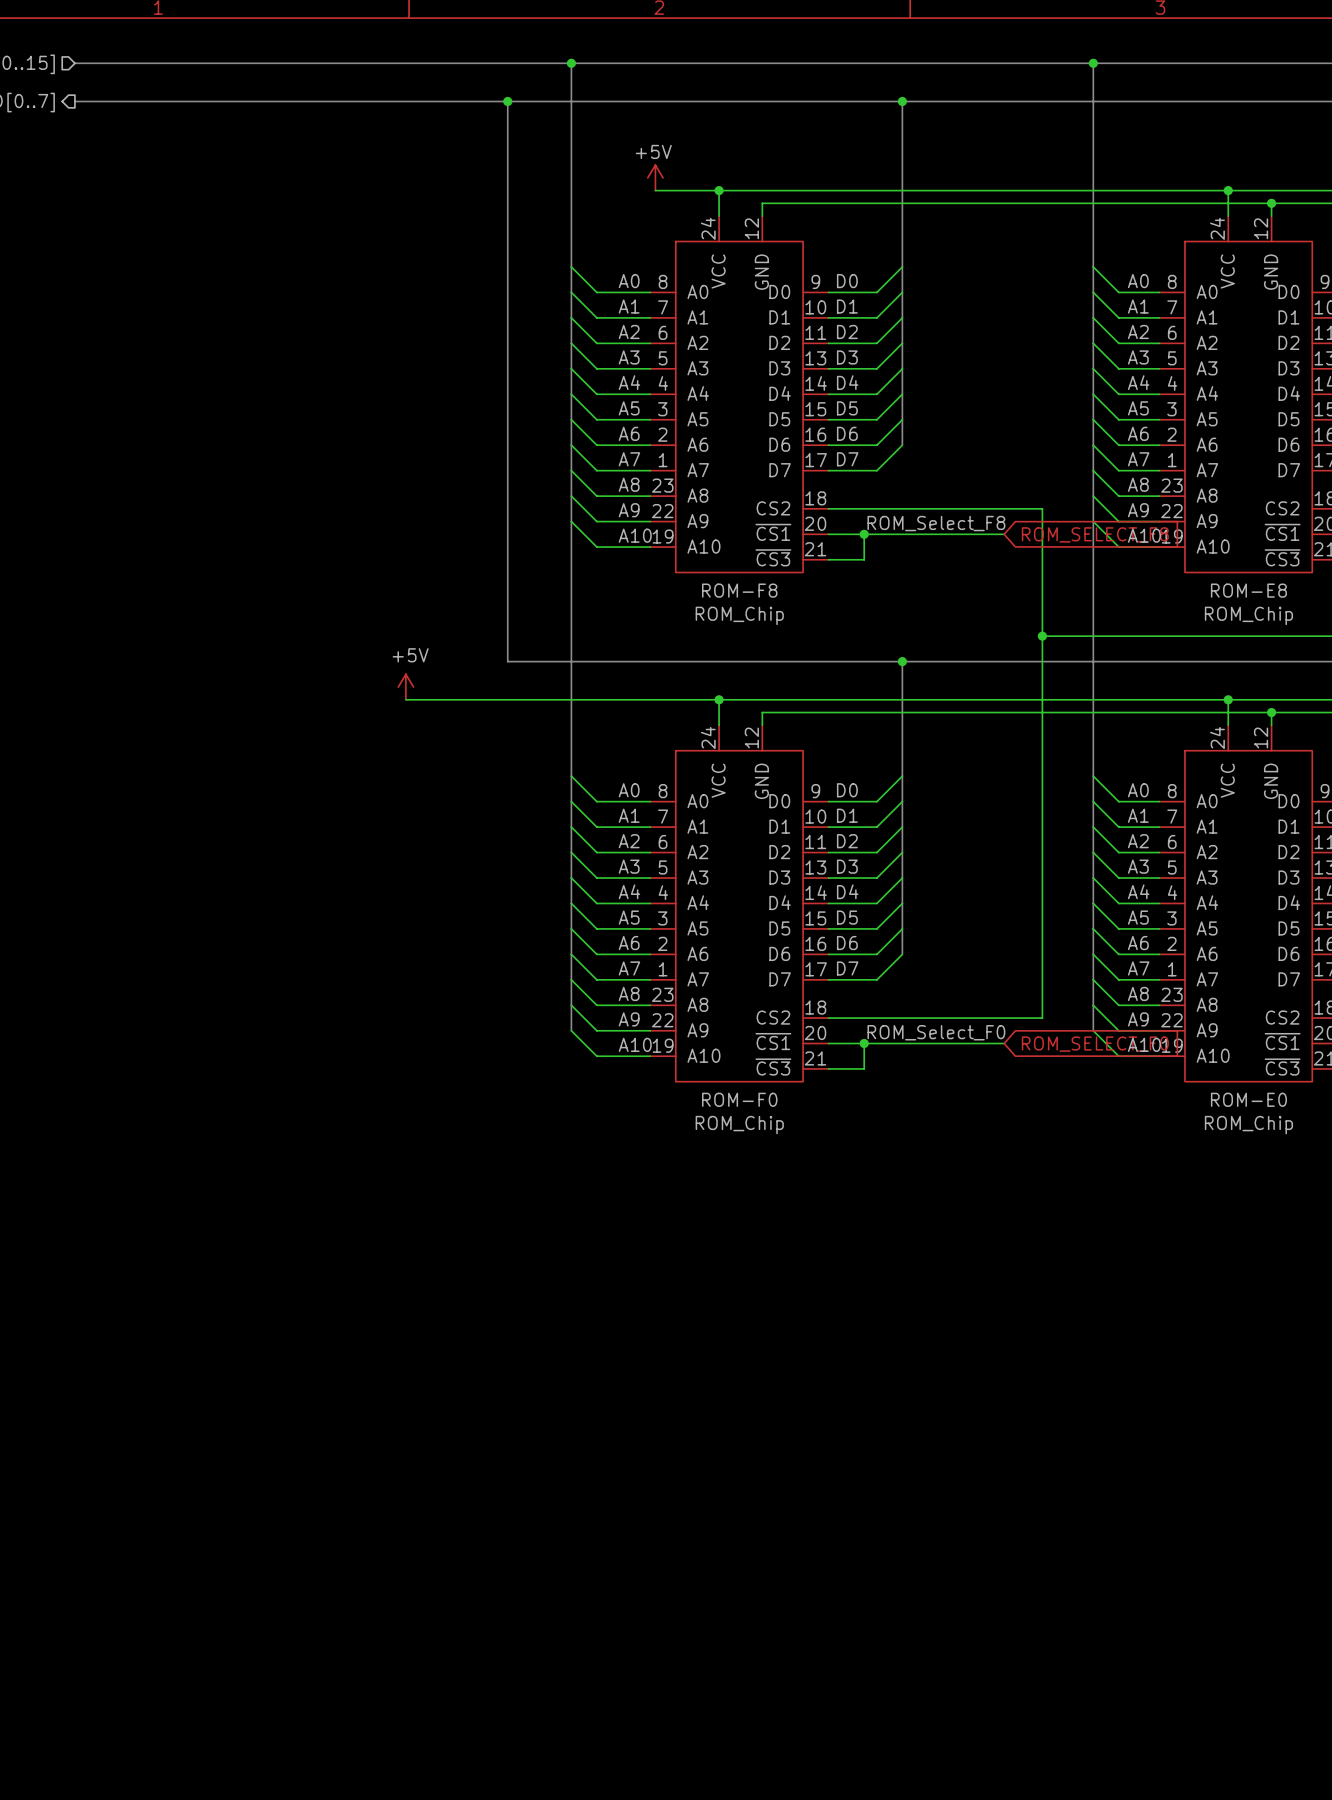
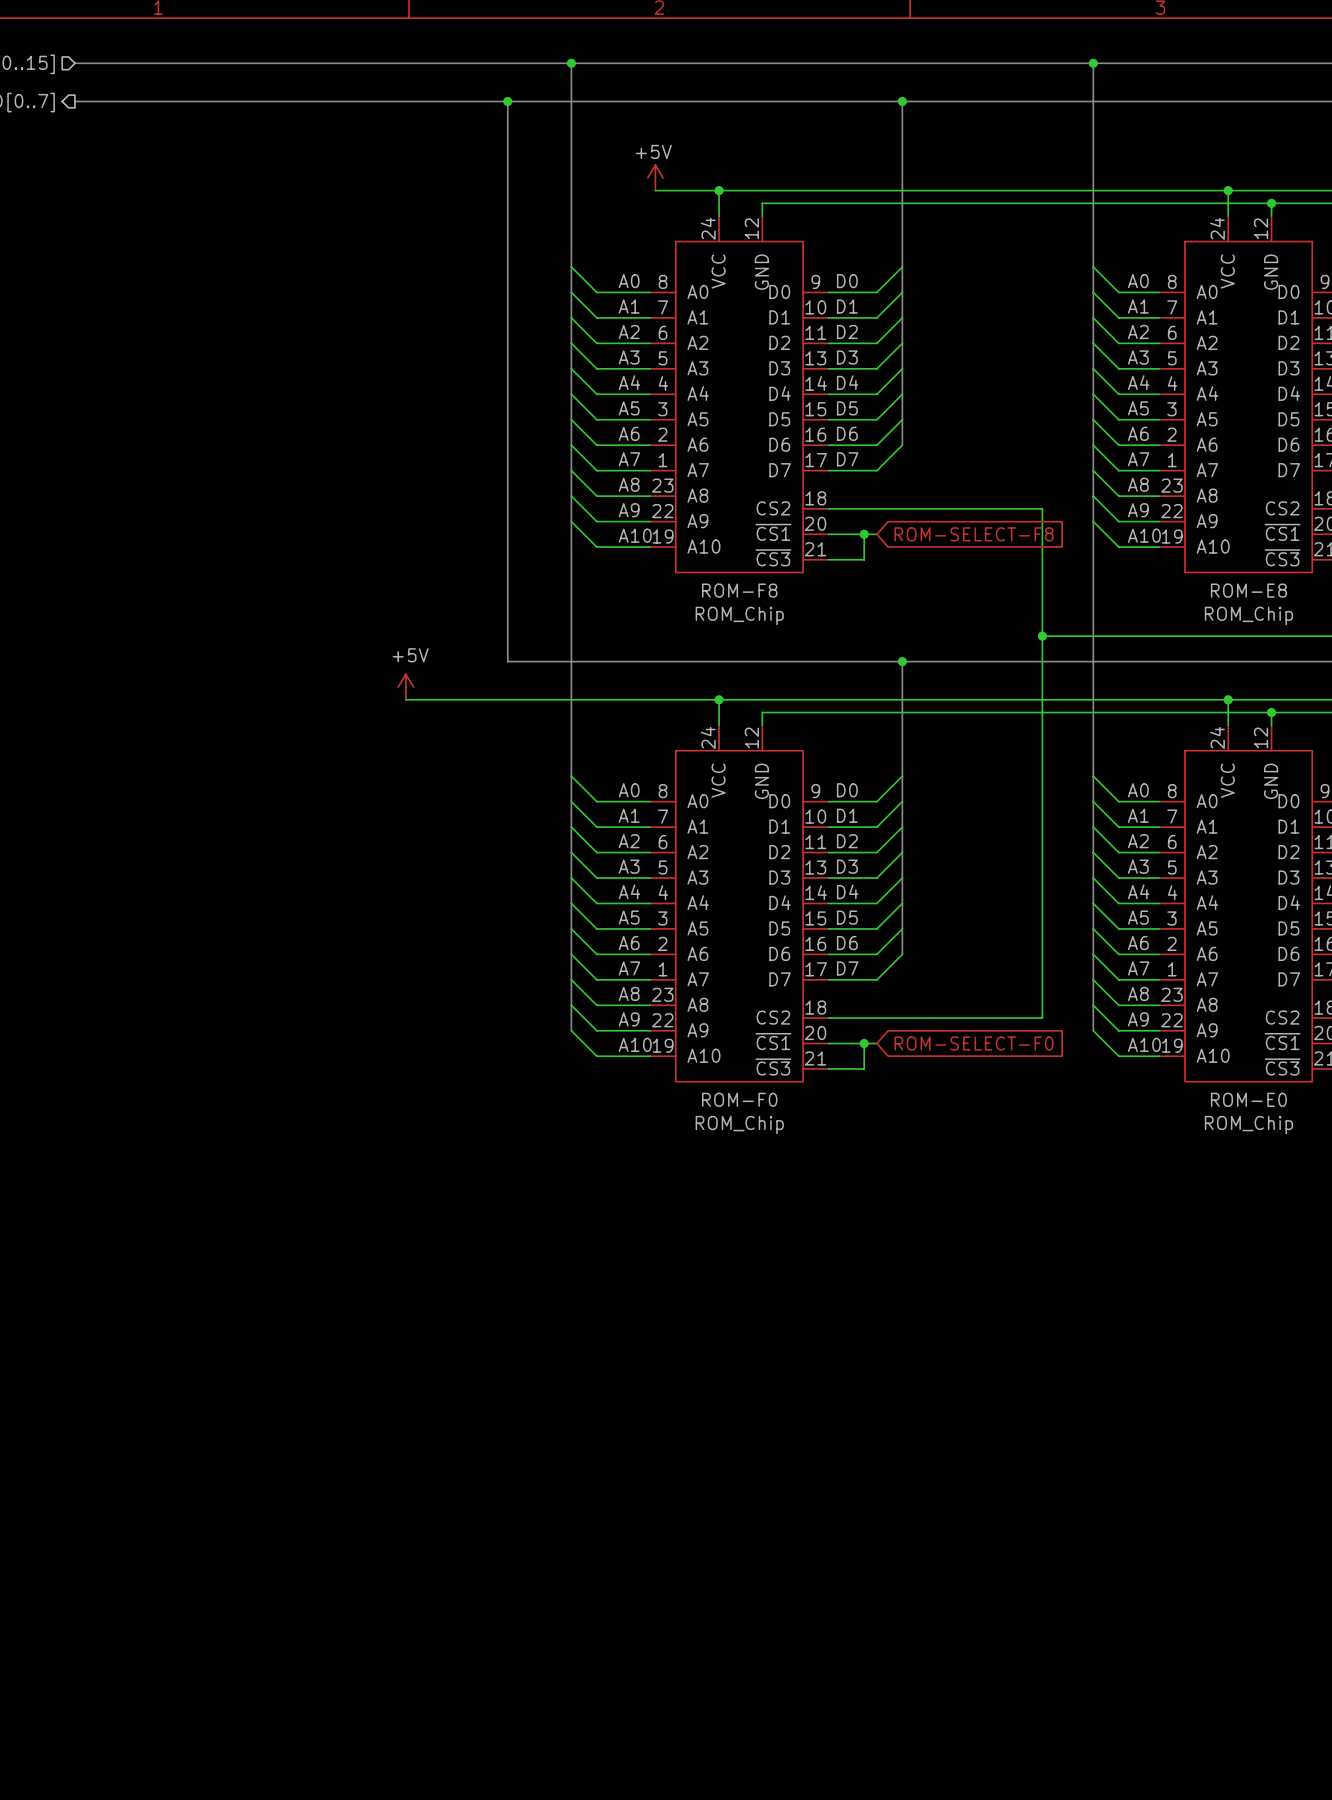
label: ROM_Select_F8 (936, 523) -> none
wire: (876, 534) (1004, 534) -> none
global label: ROM_SELECT_F8 (1095, 534) -> ROM-SELECT-F8 (974, 534)
label: ROM_Select_F0 (936, 1032) -> none
wire: (876, 1043) (1004, 1043) -> none
global label: ROM_SELECT_F0 (1095, 1044) -> ROM-SELECT-F0 (974, 1043)

